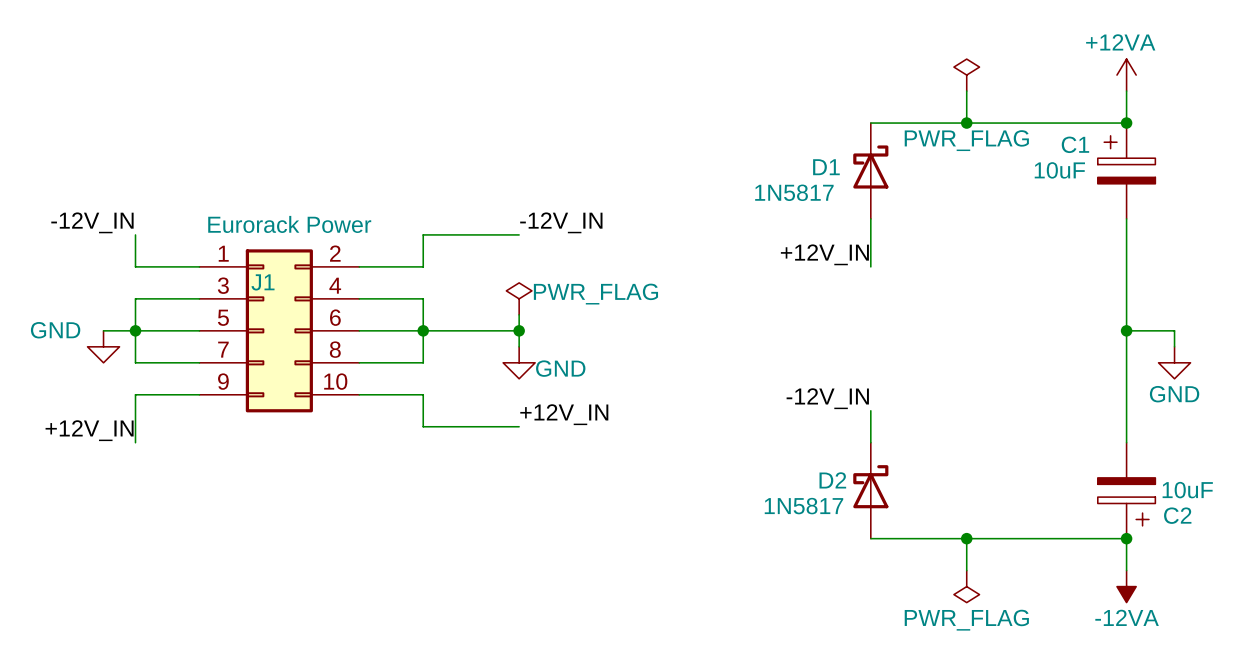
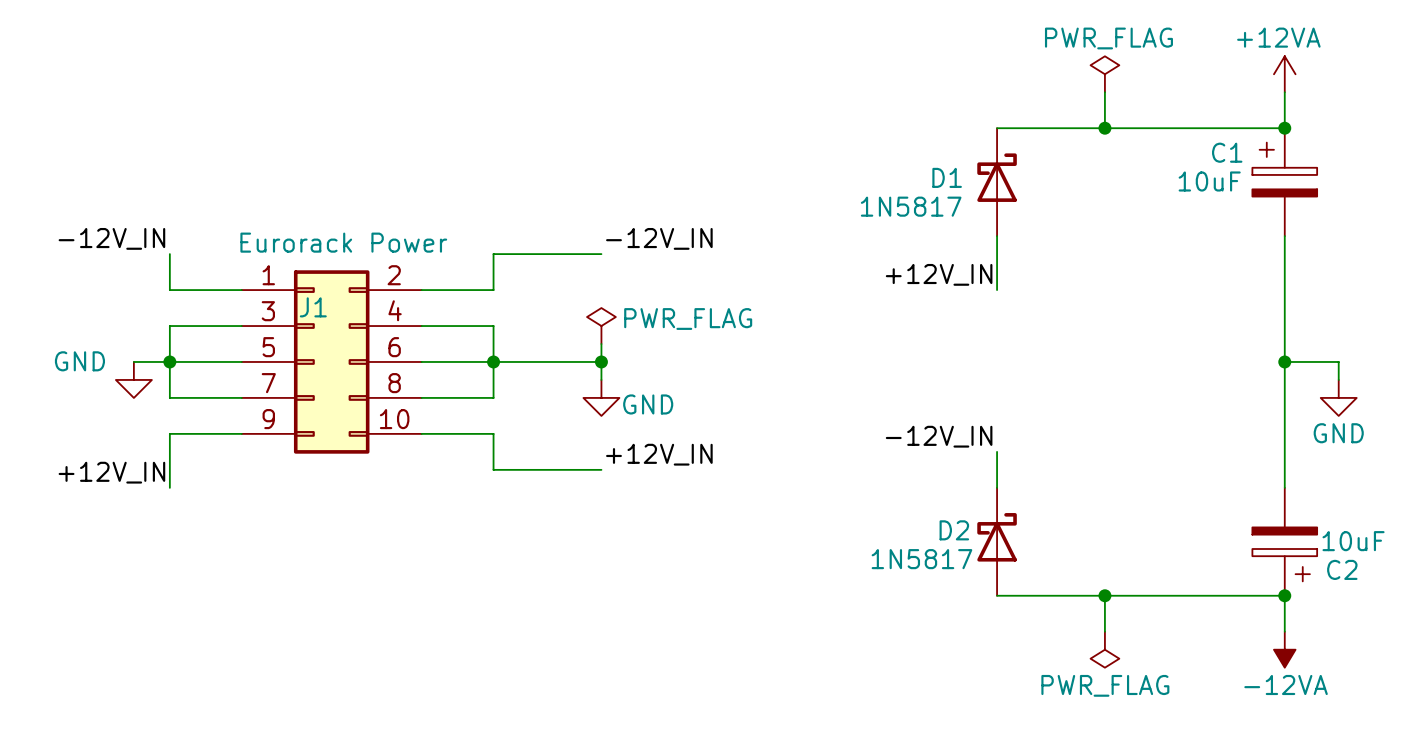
power symbol text position: PWR_FLAG (966, 140) -> PWR_FLAG (1108, 38)

